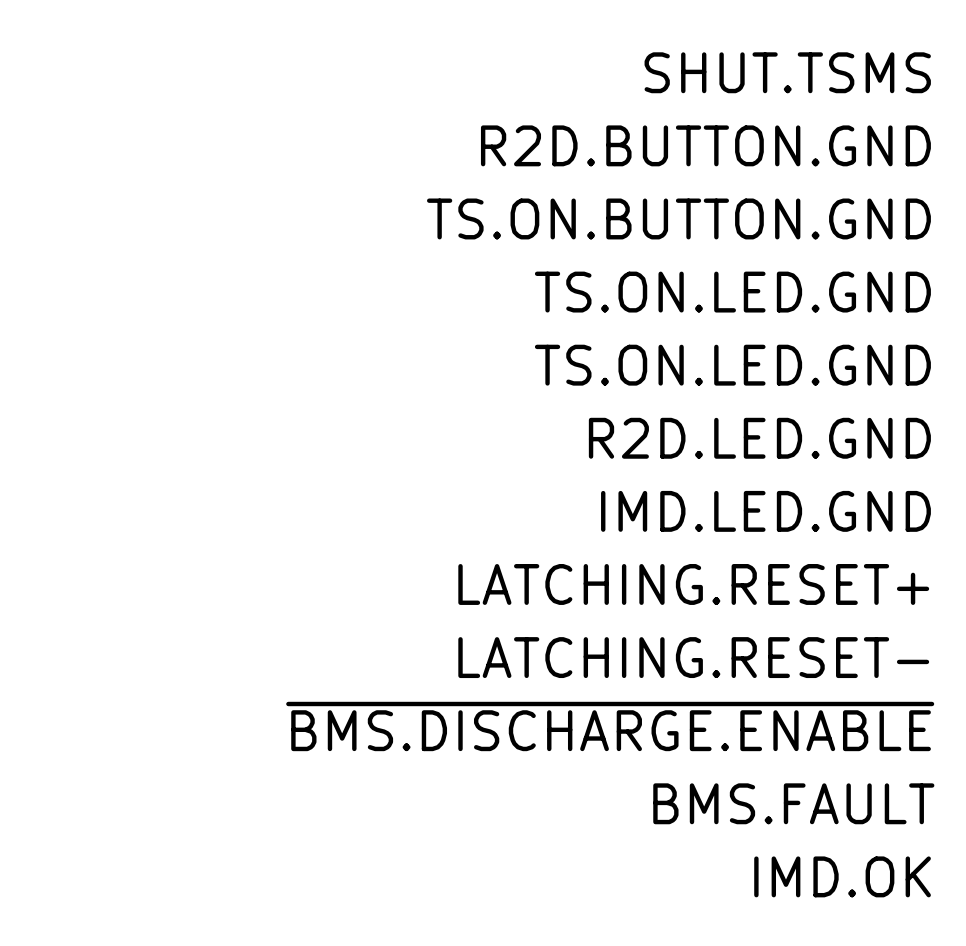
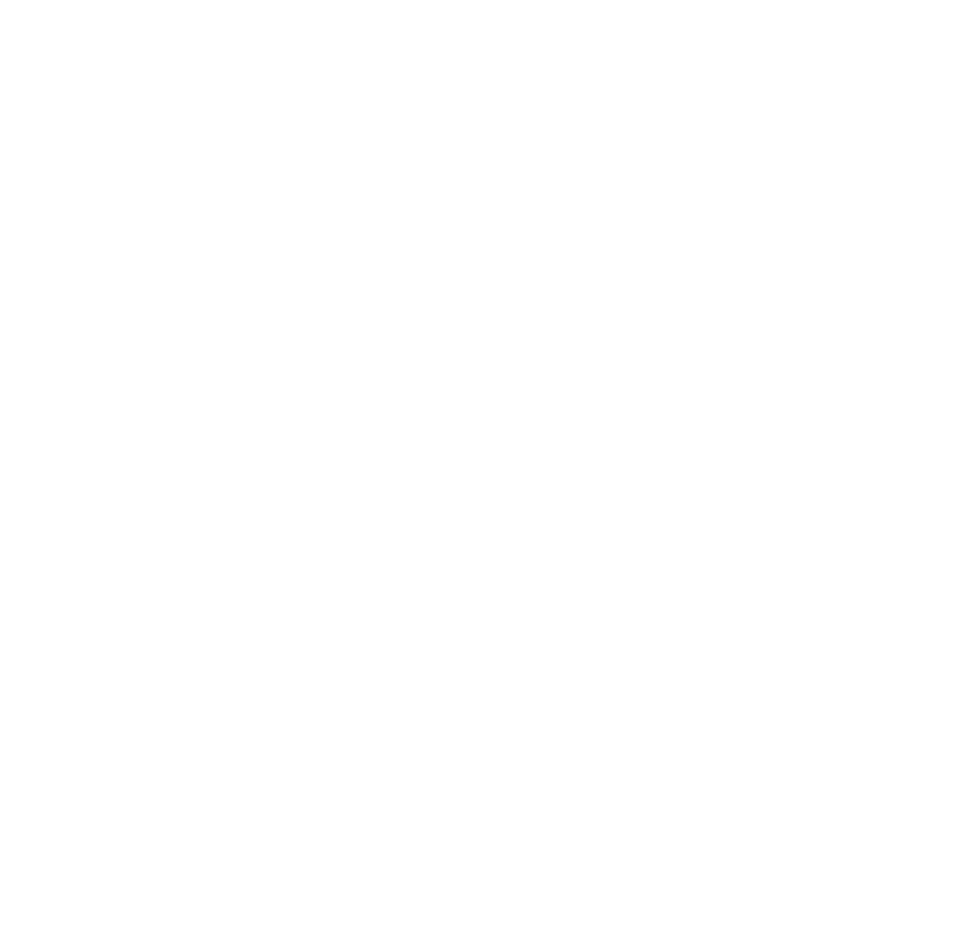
label: SHUT.TSMS (787, 72) -> none
label: R2D.BUTTON.GND (705, 145) -> none
label: TS.ON.BUTTON.GND (678, 218) -> none
label: TS.ON.LED.GND (732, 292) -> none
label: TS.ON.LED.GND (732, 365) -> none
label: R2D.LED.GND (759, 438) -> none
label: IMD.LED.GND (765, 511) -> none
label: LATCHING.RESET+ (693, 584) -> none
label: LATCHING.RESET- (693, 657) -> none
label: ~{BMS.DISCHARGE.ENABLE} (610, 726) -> none
label: BMS.FAULT (793, 803) -> none
label: IMD.OK (842, 876) -> none

